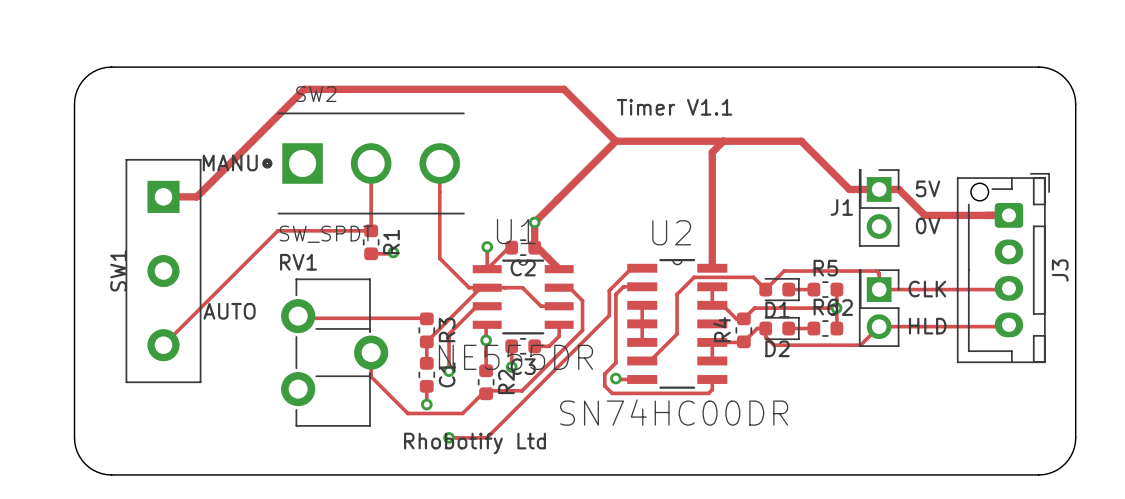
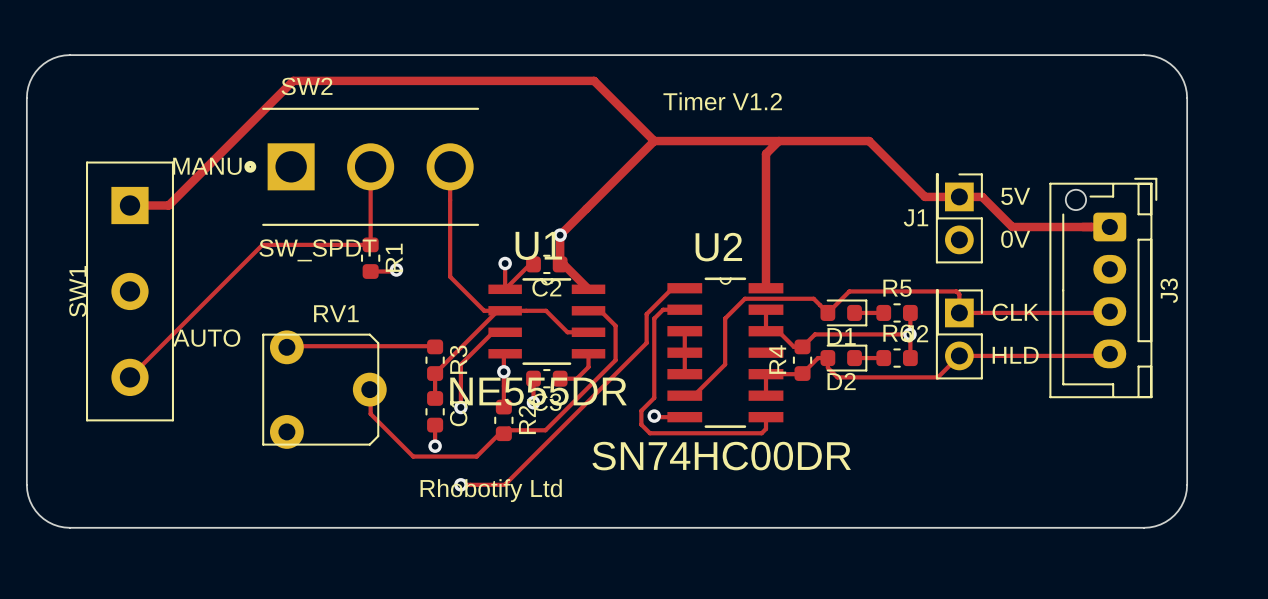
text: Timer V1.1 (674, 107) -> Timer V1.2 (722, 101)
RV1 name position: RV1 (298, 262) -> RV1 (336, 313)
RV1 footprint: [281, 278, 389, 427] -> [262, 330, 387, 449]

